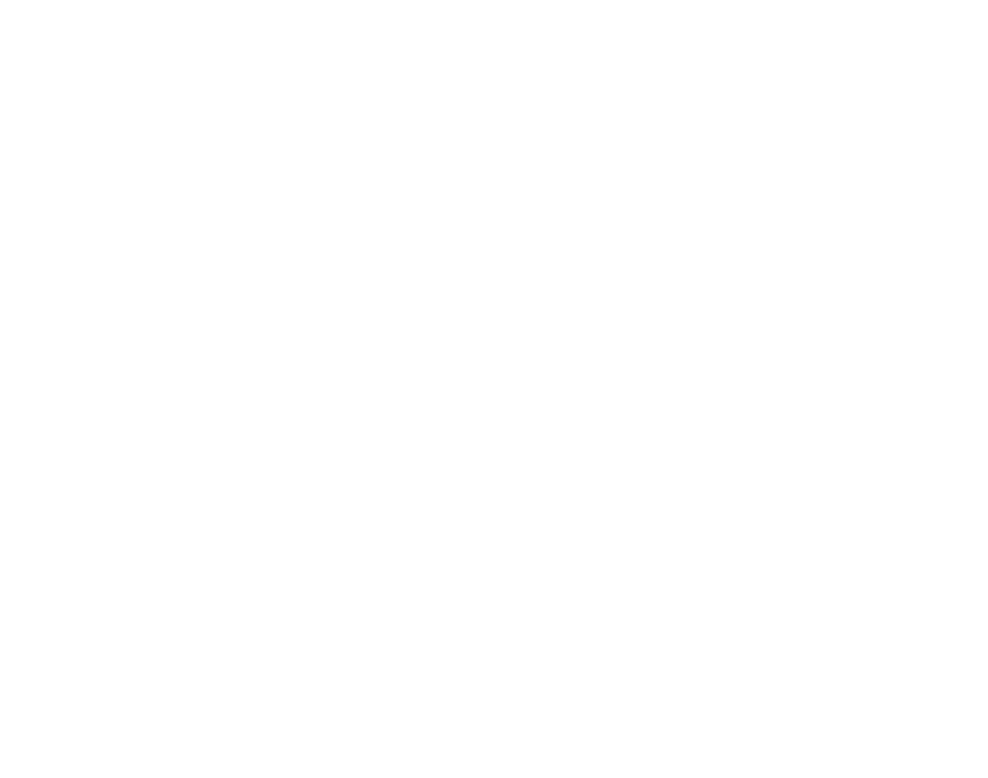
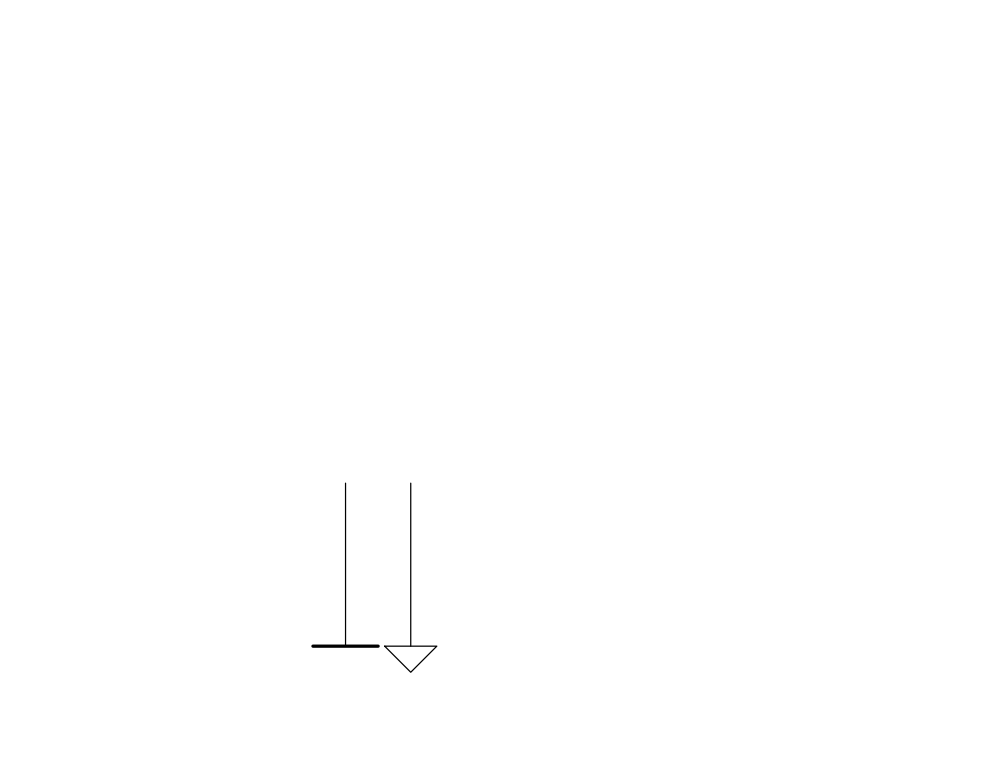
wire: none -> (345, 483) (345, 646)
wire: none -> (410, 483) (410, 646)
power symbol: none -> (345, 646)
power symbol: none -> (410, 659)

